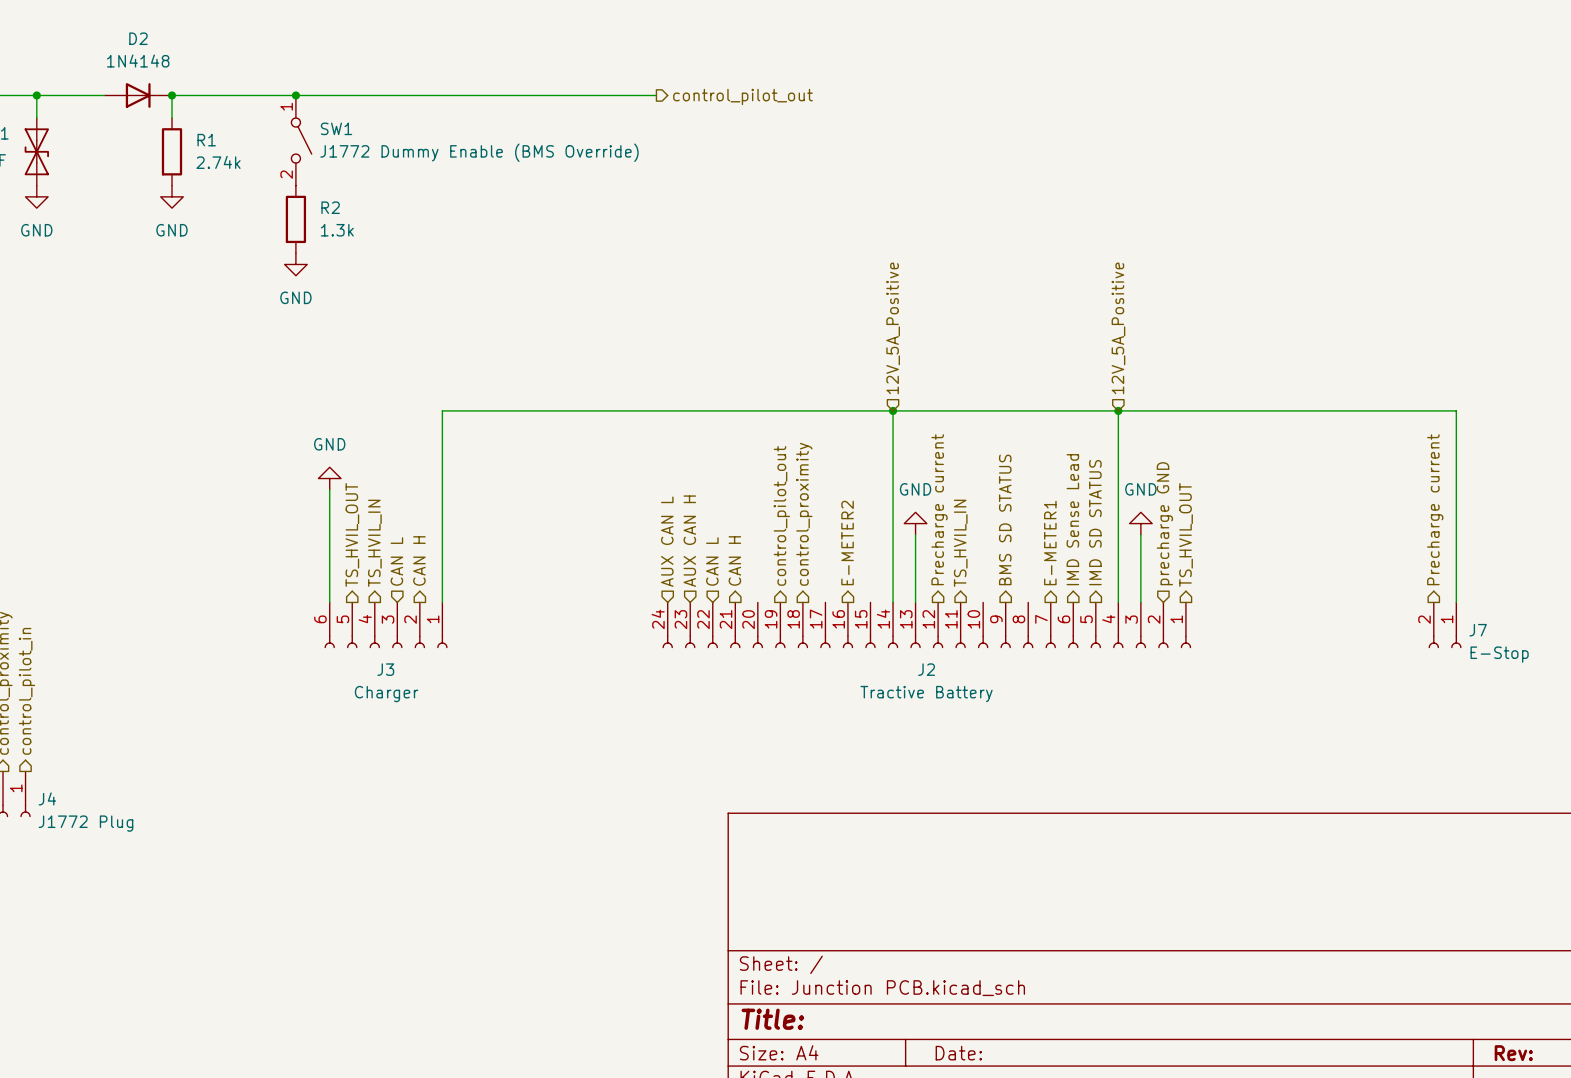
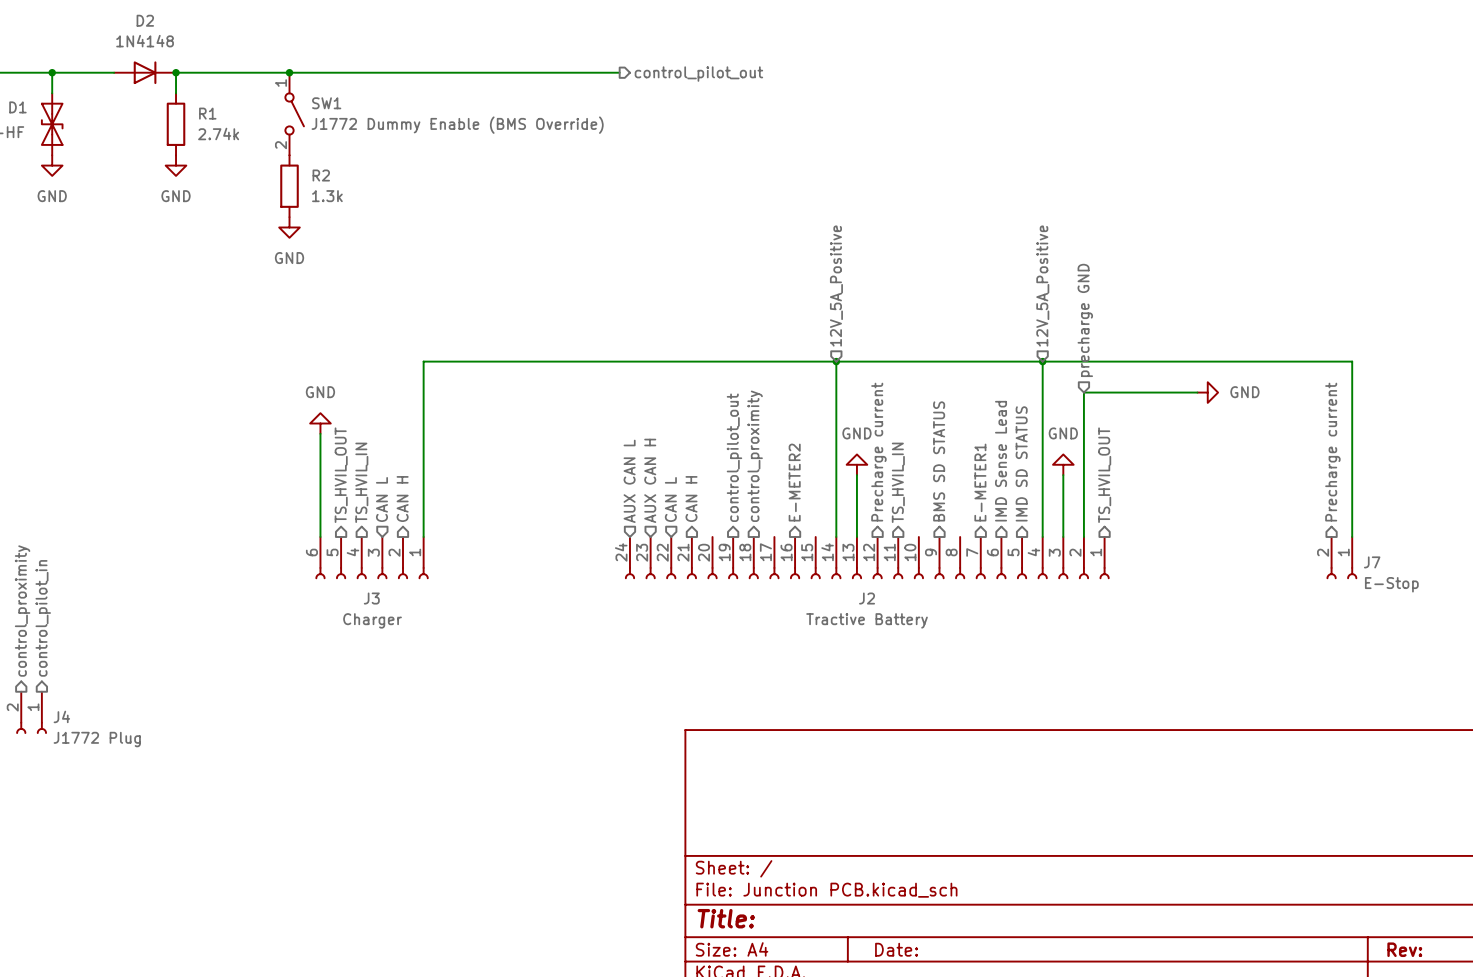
wire: none -> (1197, 392) (1083, 392) (1083, 537)
power symbol: none -> GND (1207, 392)
hierarchical label position: precharge GND (1164, 523) -> precharge GND (1085, 320)

